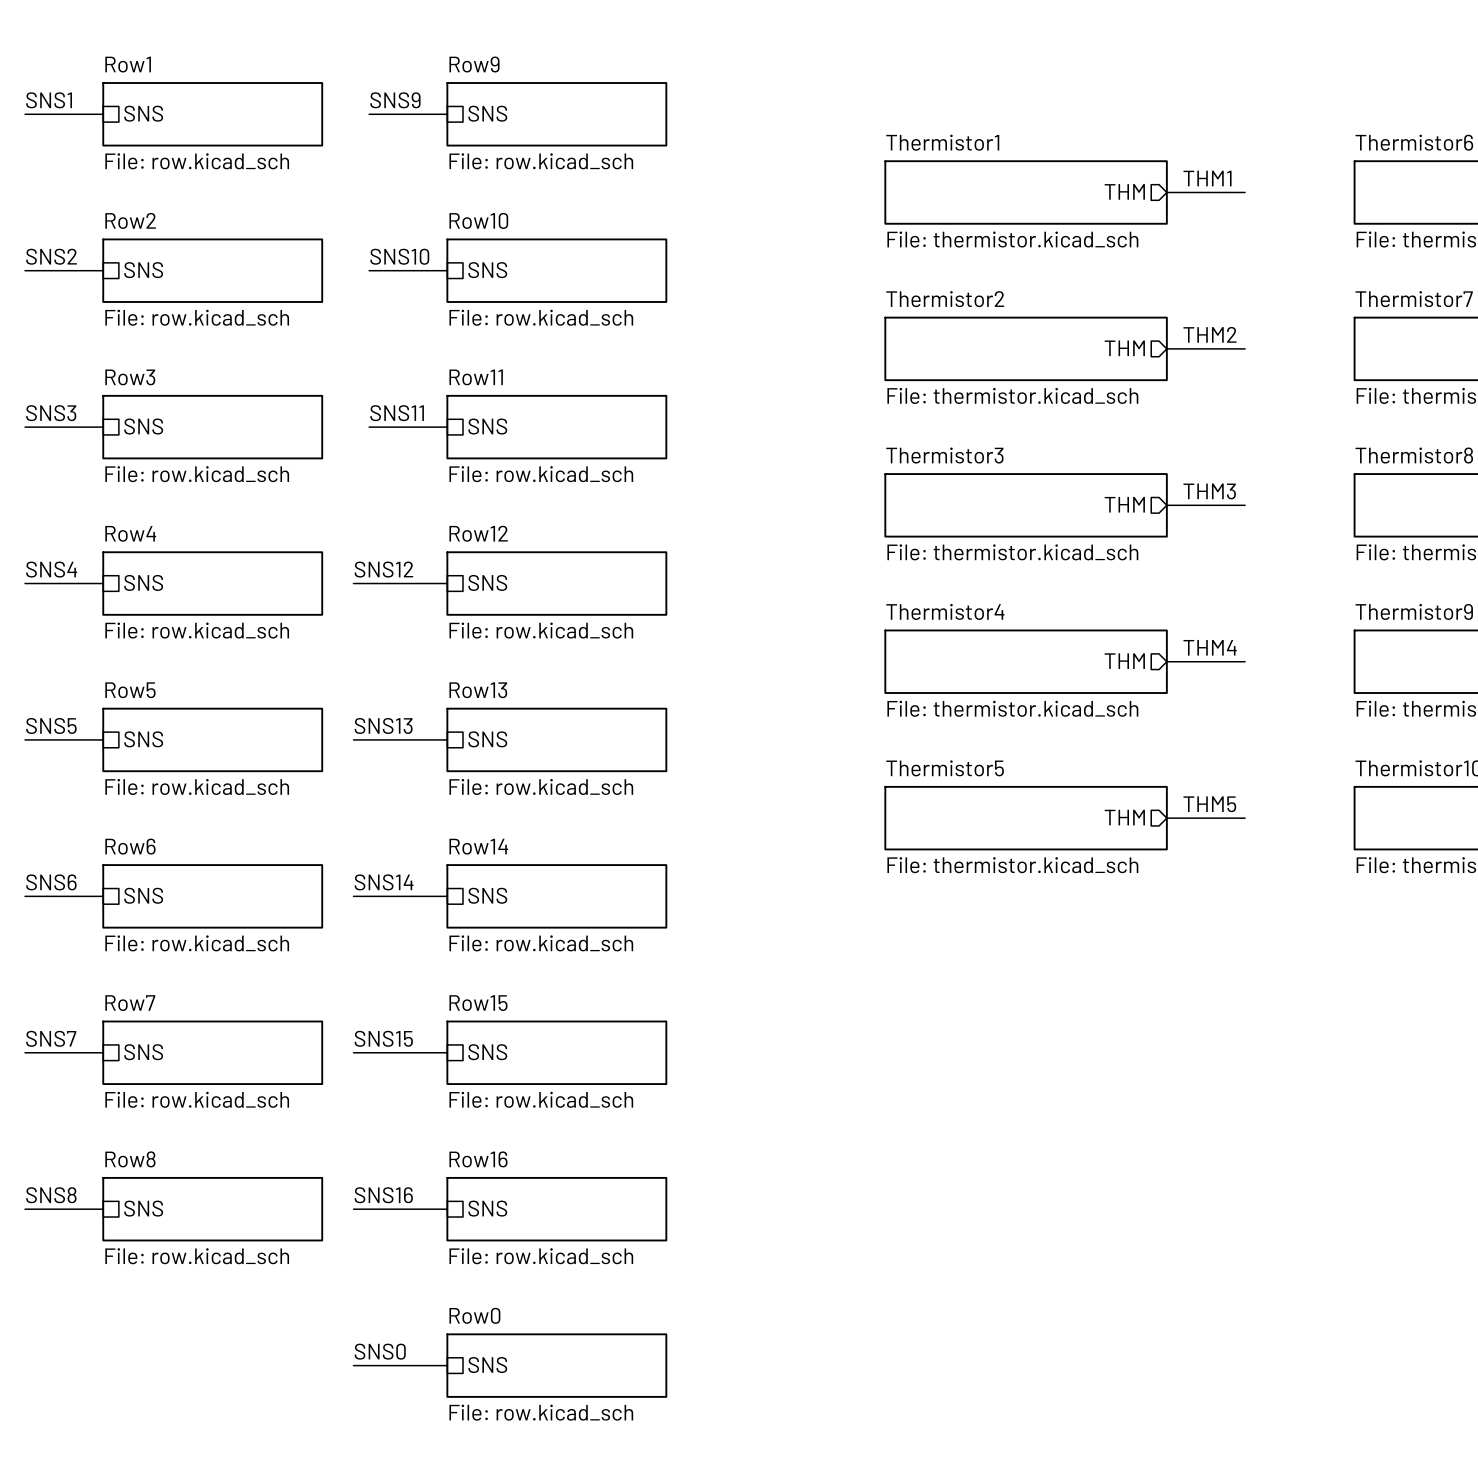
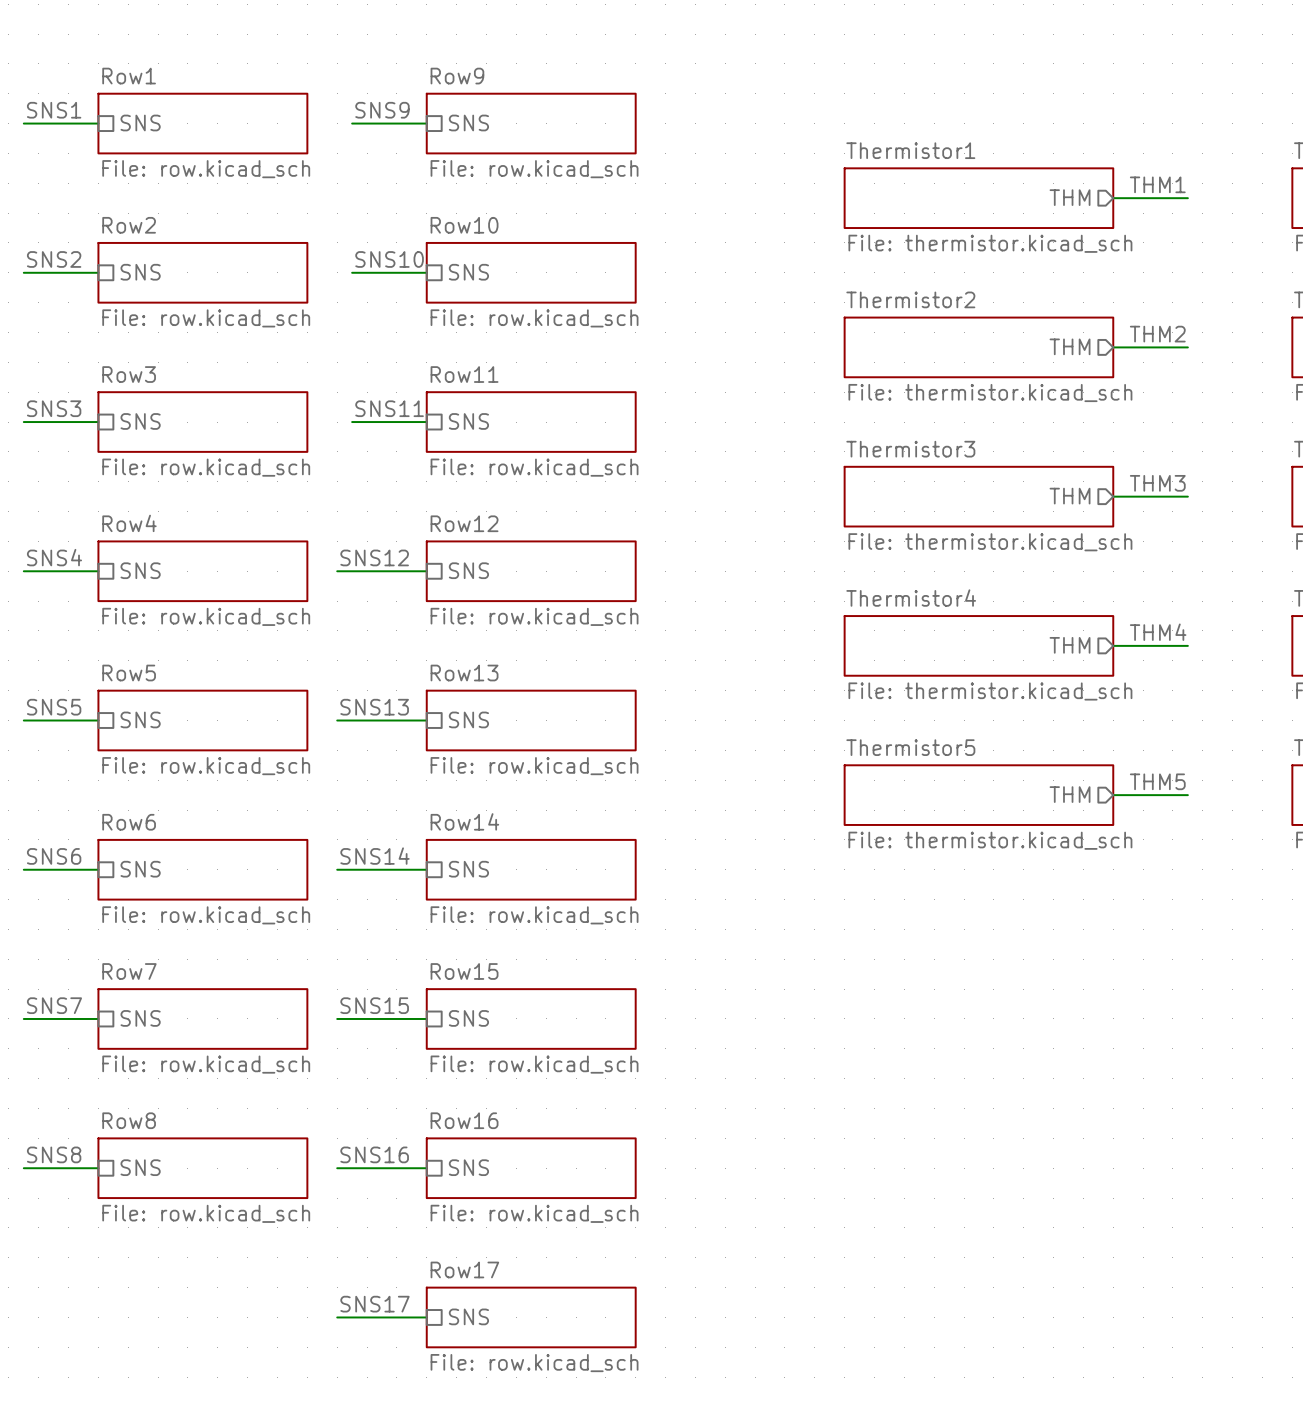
sheet Row0 name: Row0 (474, 1315) -> Row17 (464, 1269)
label: SNS0 (380, 1351) -> SNS17 (374, 1304)

